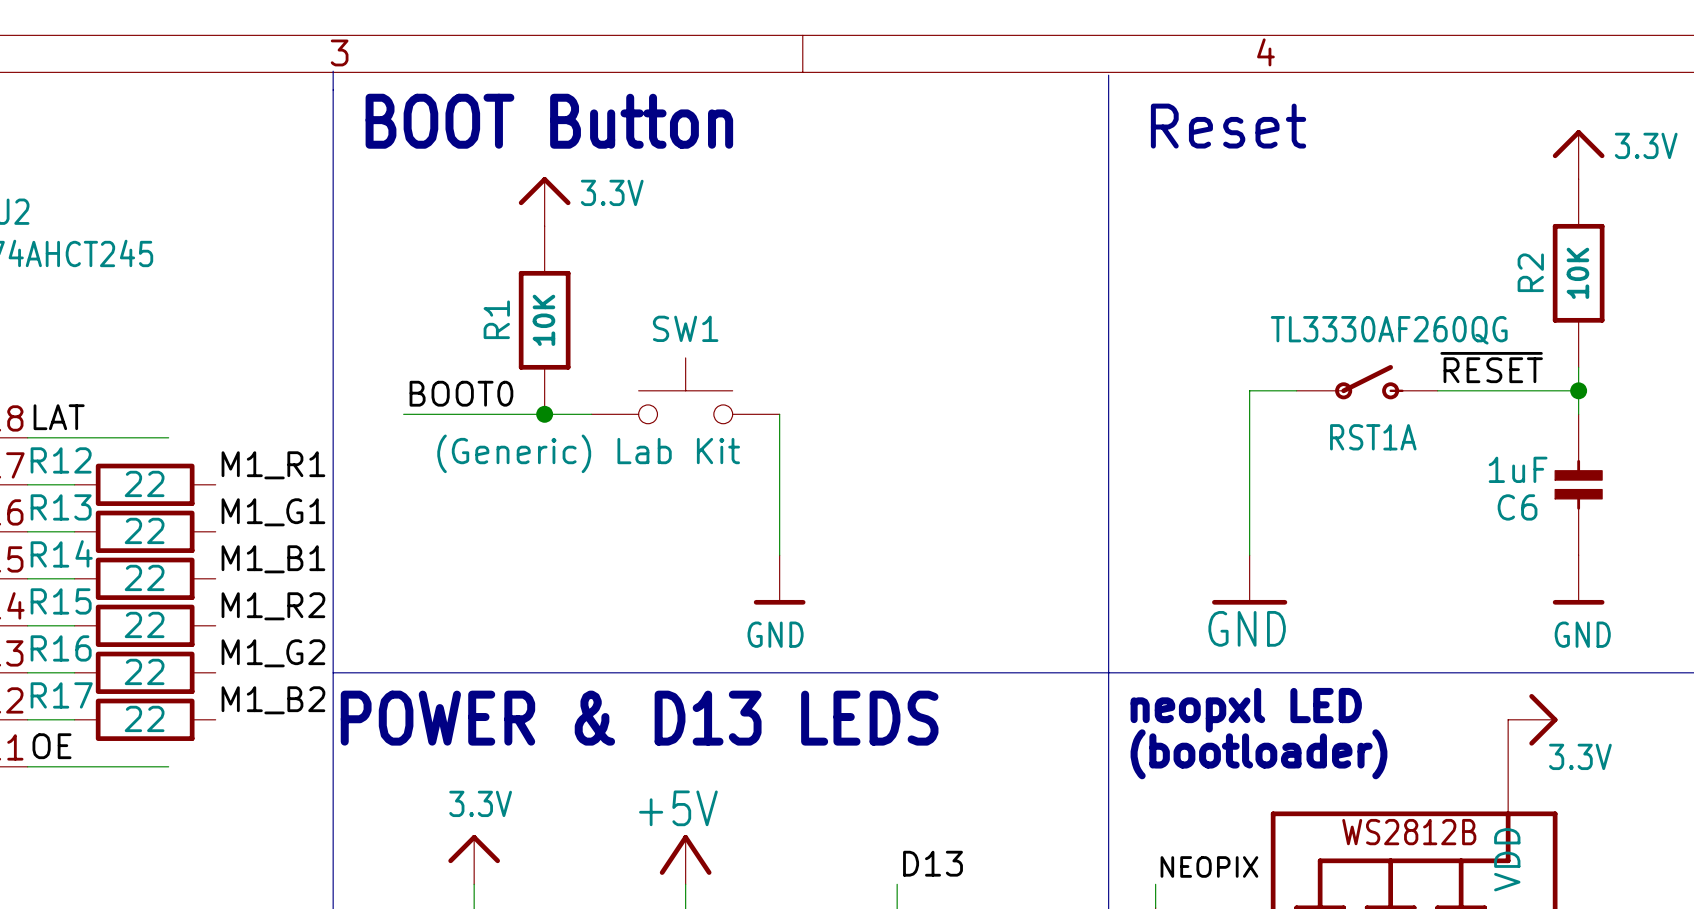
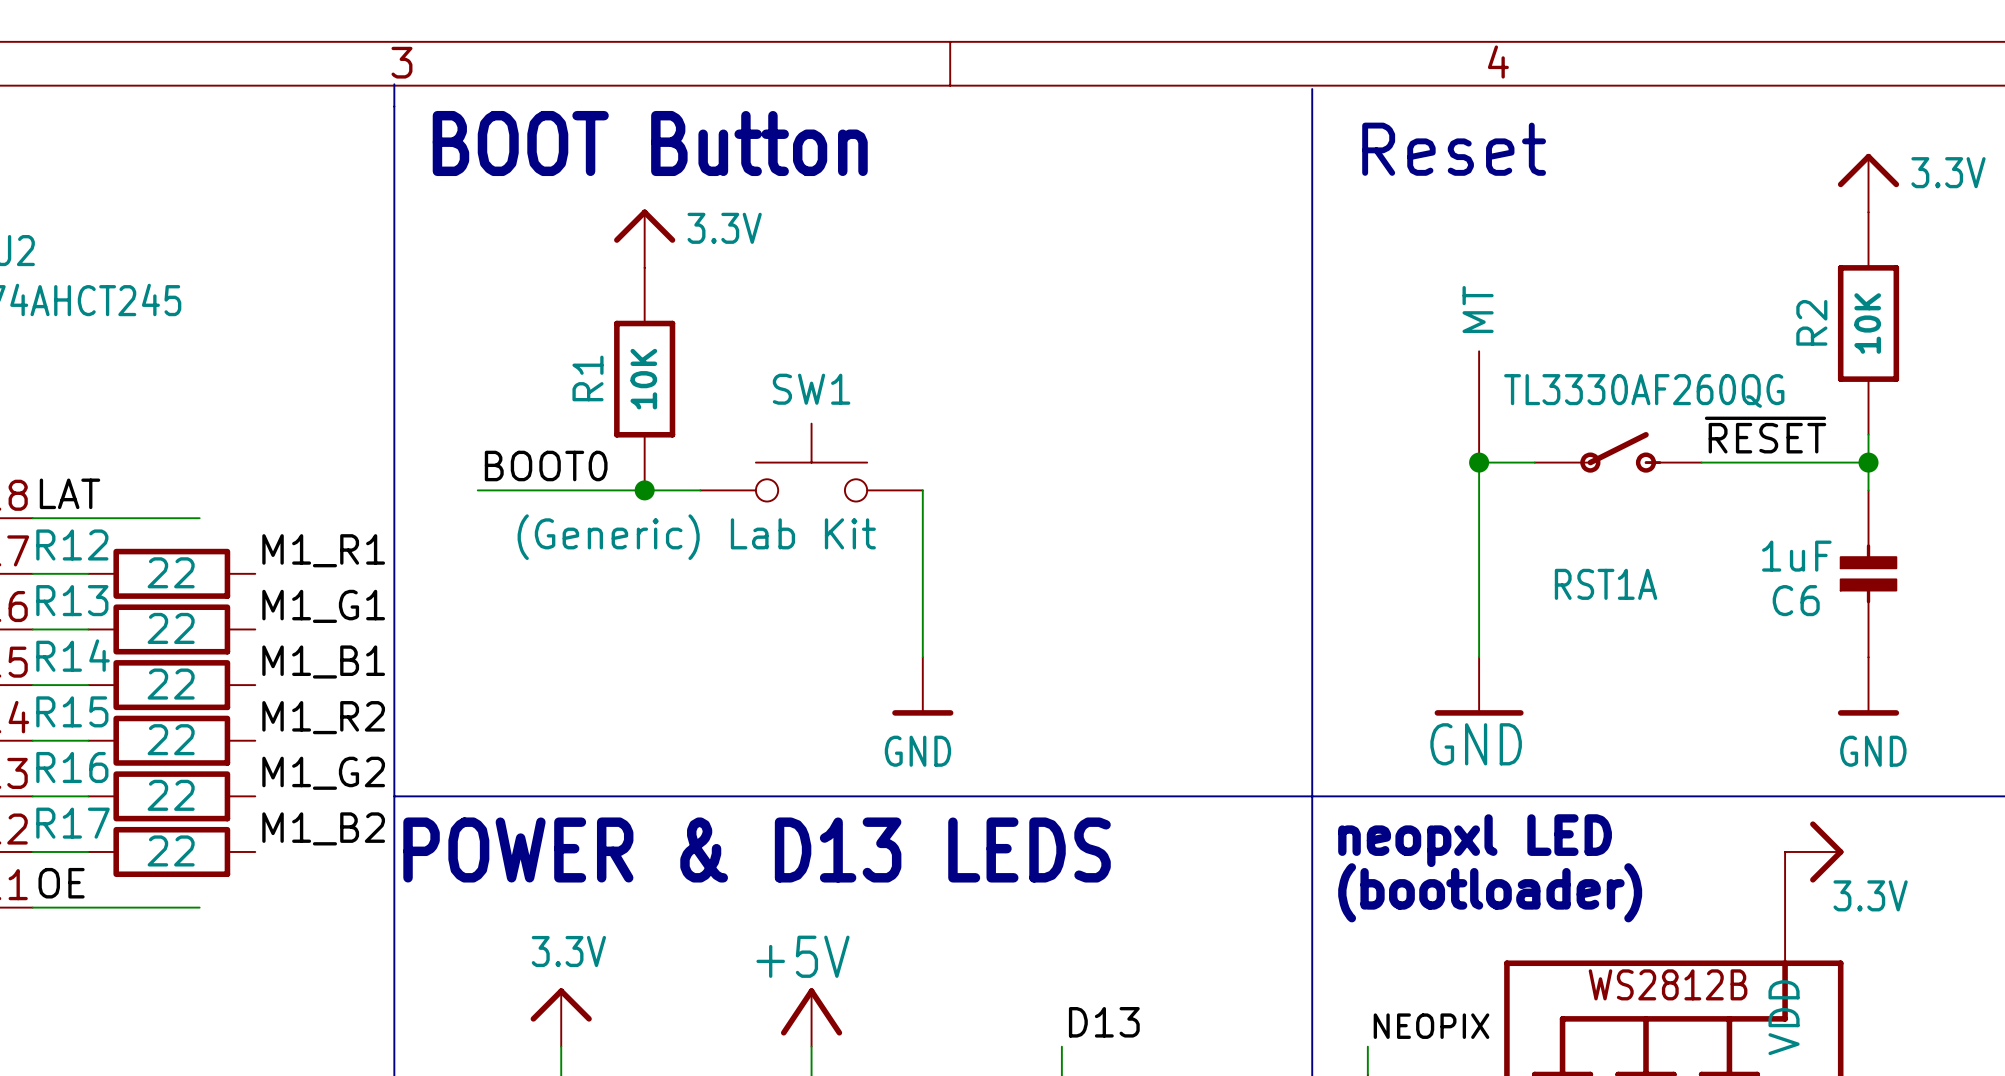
part: none -> (1479, 406)
junction: none -> (1479, 462)
RST1A name position: RST1A (1373, 437) -> RST1A (1606, 584)

